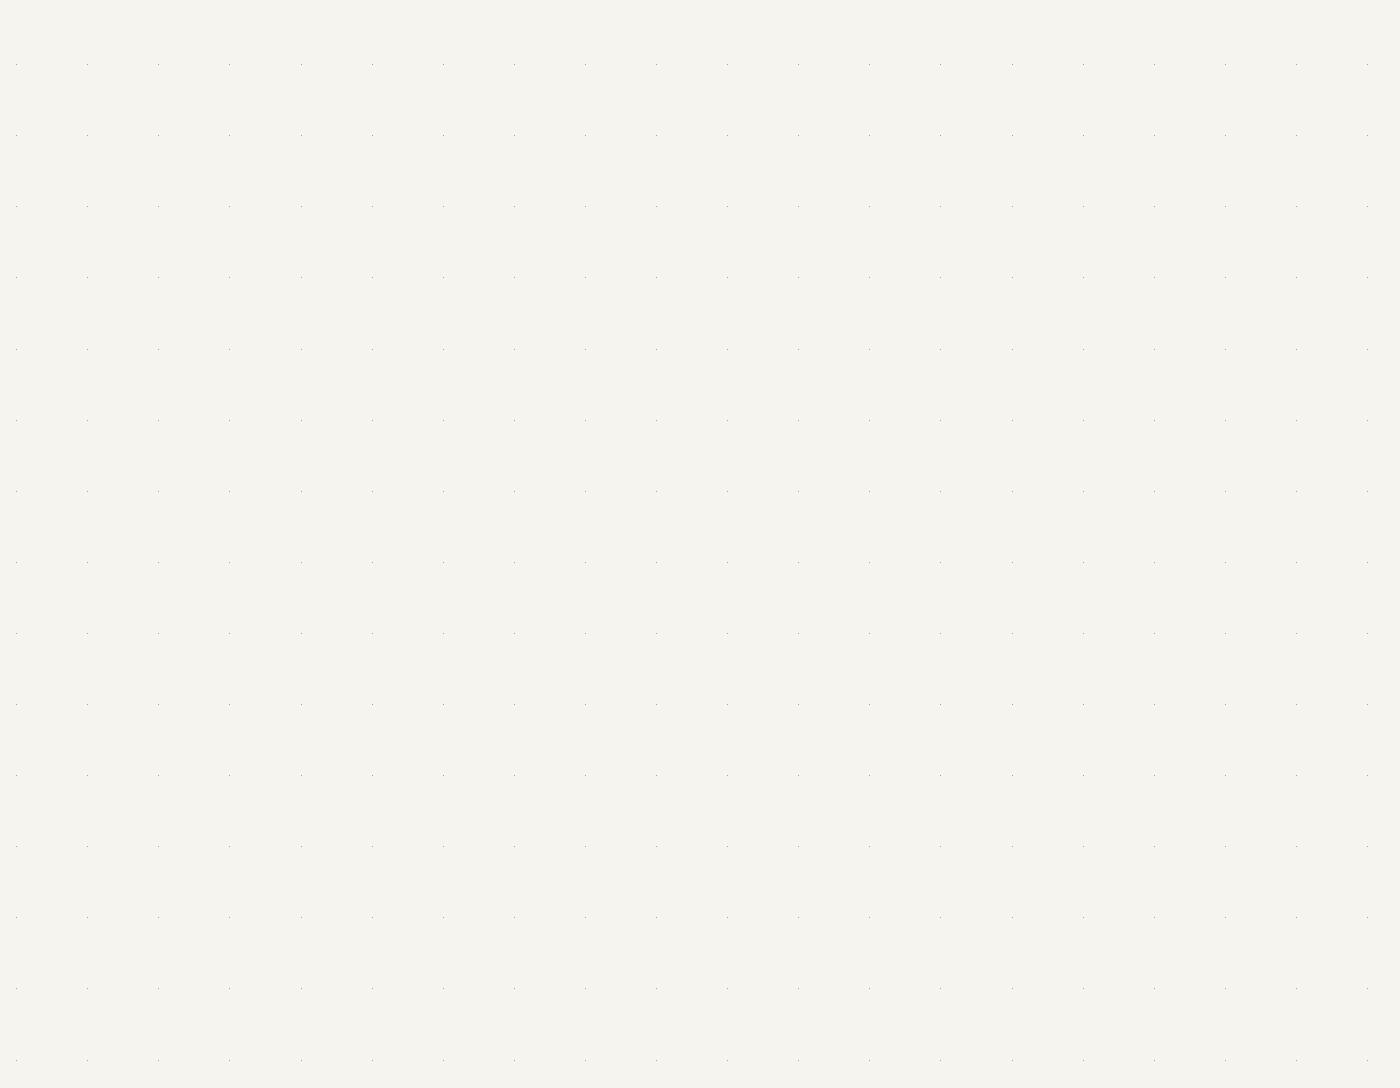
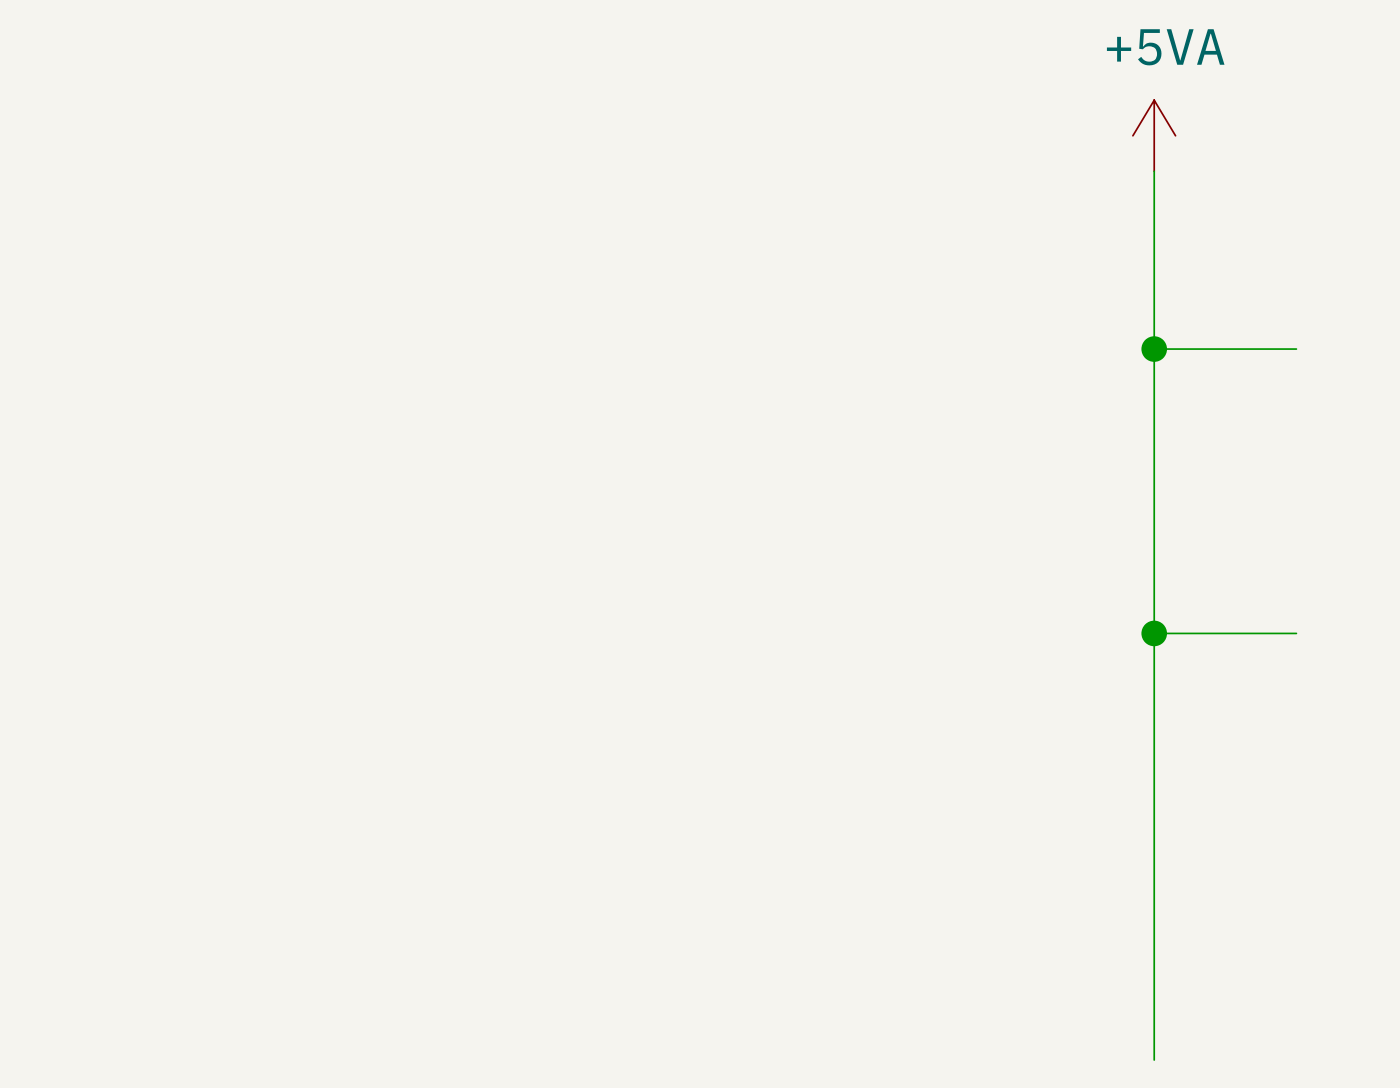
power symbol: none -> +5VA (1154, 135)
wire: none -> (1154, 171) (1154, 1060)
wire: none -> (1154, 349) (1296, 349)
junction: none -> (1154, 349)
wire: none -> (1154, 633) (1296, 633)
junction: none -> (1154, 633)

